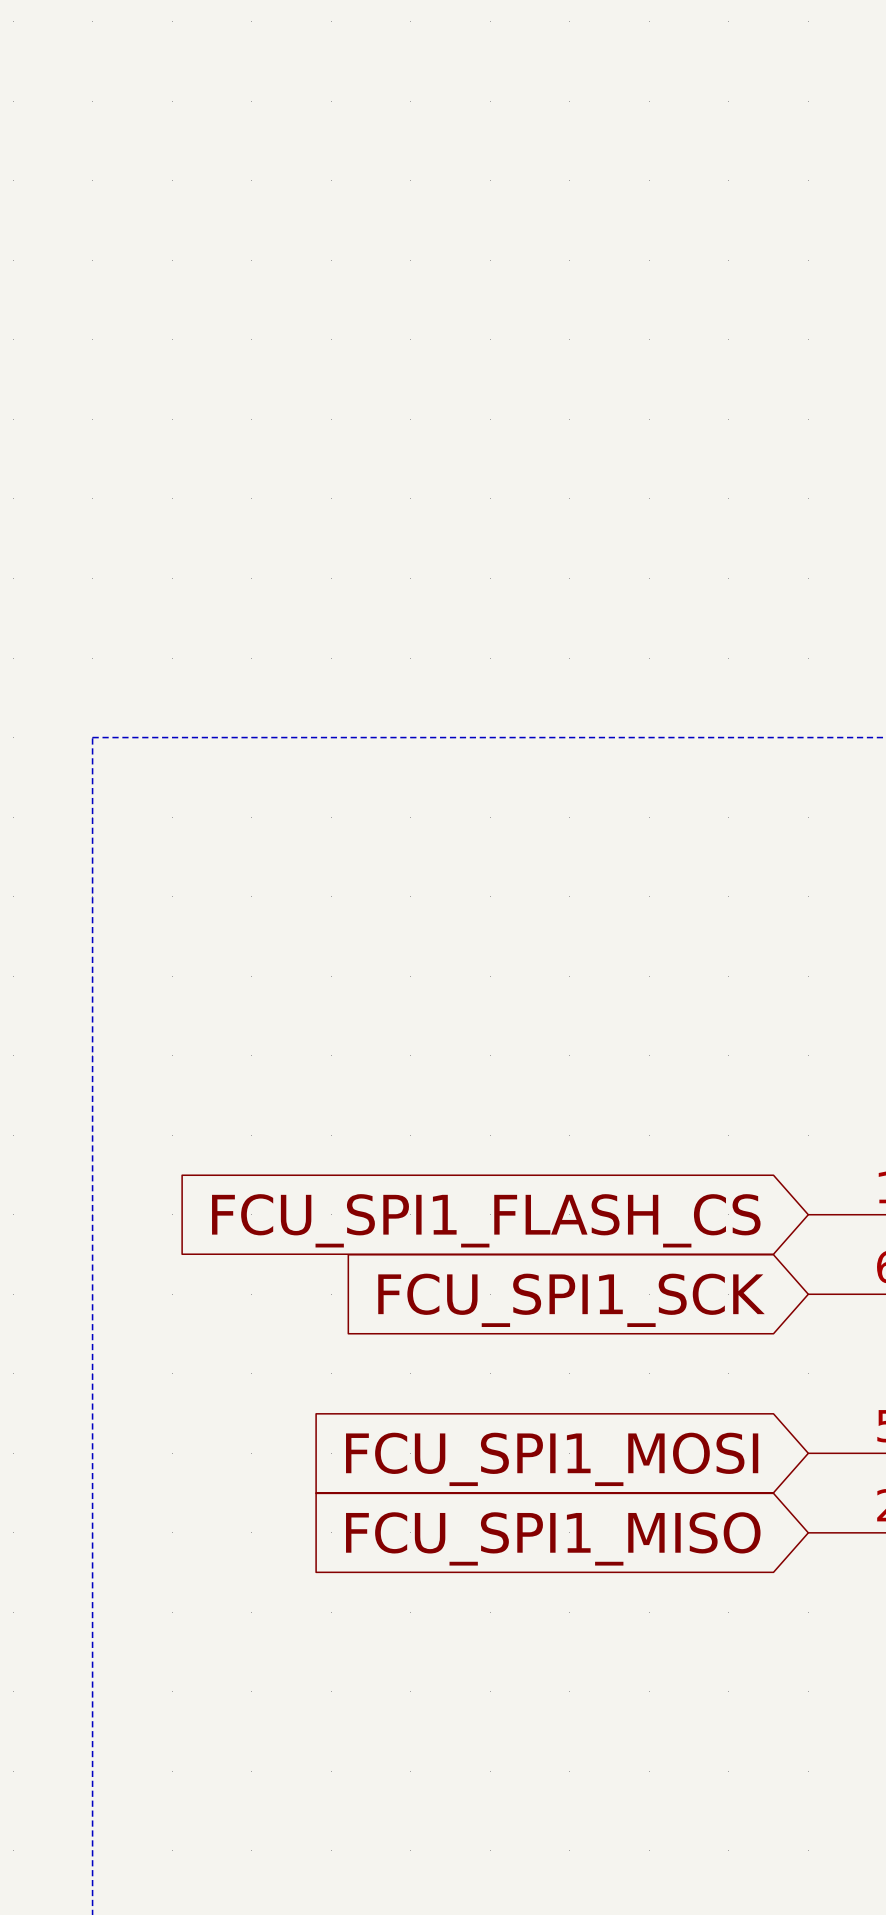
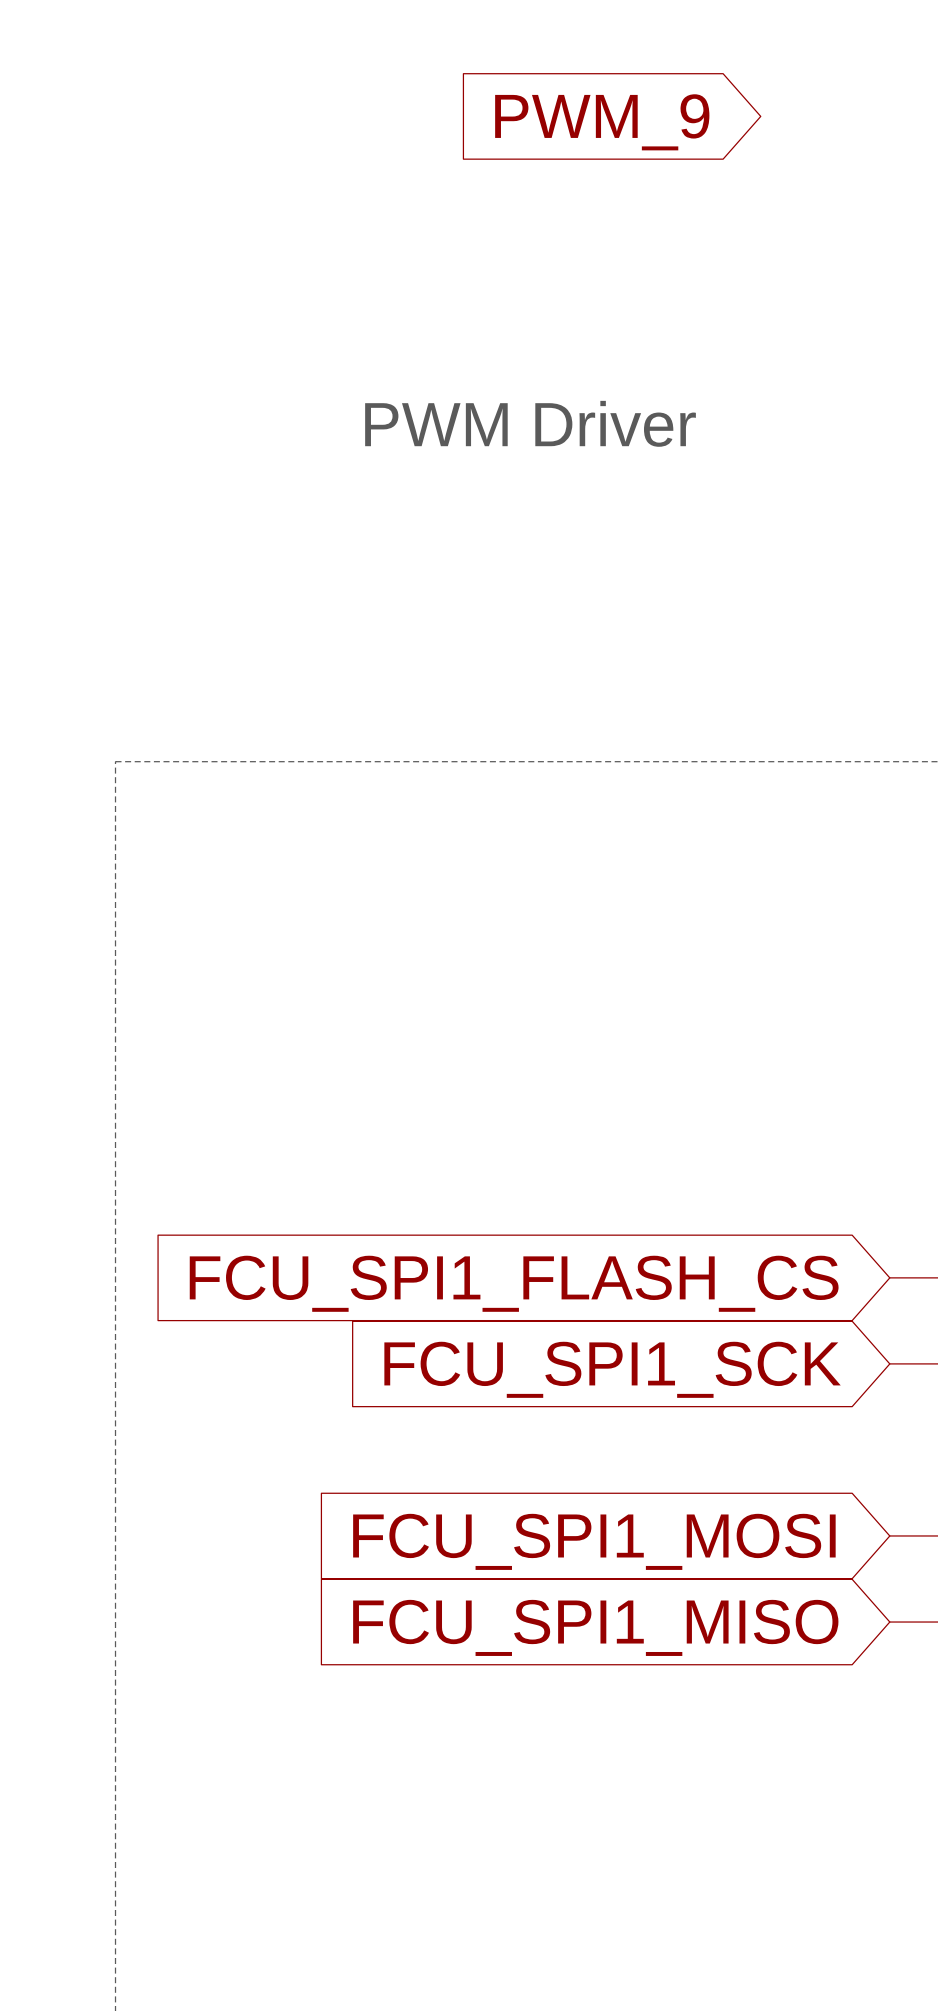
global label: none -> PWM_9 (602, 122)
text: none -> PWM Driver (530, 423)

